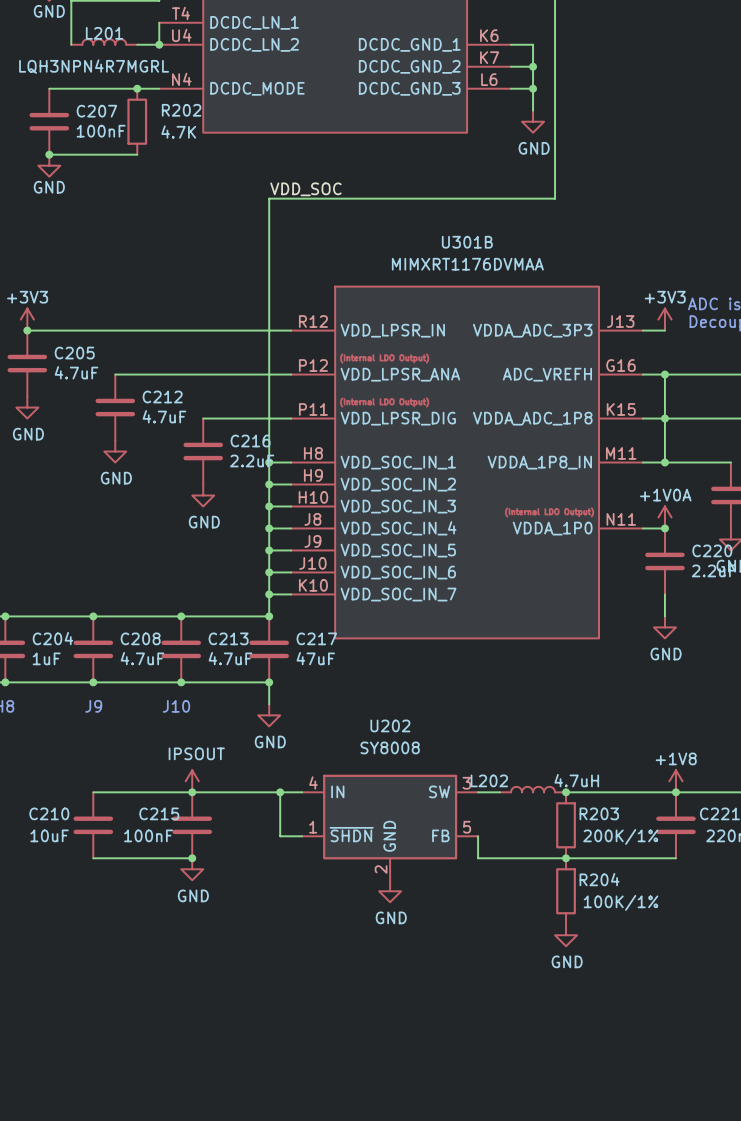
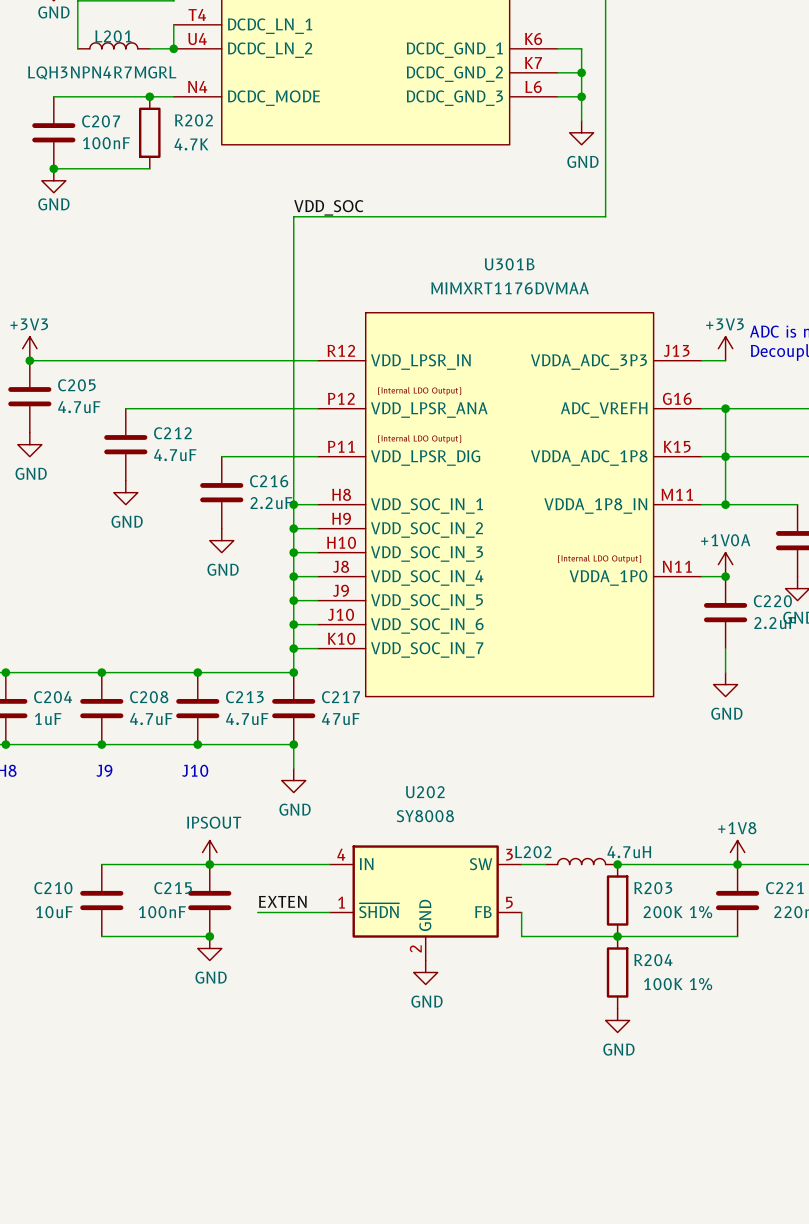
wire: (280, 792) (280, 836) -> (257, 912) (305, 912)
junction: (280, 792) -> none
label: none -> EXTEN (282, 901)
R203 value: 200K/1% (620, 836) -> 200K 1% (677, 912)
R204 value: 100K/1% (621, 902) -> 100K 1% (678, 984)

